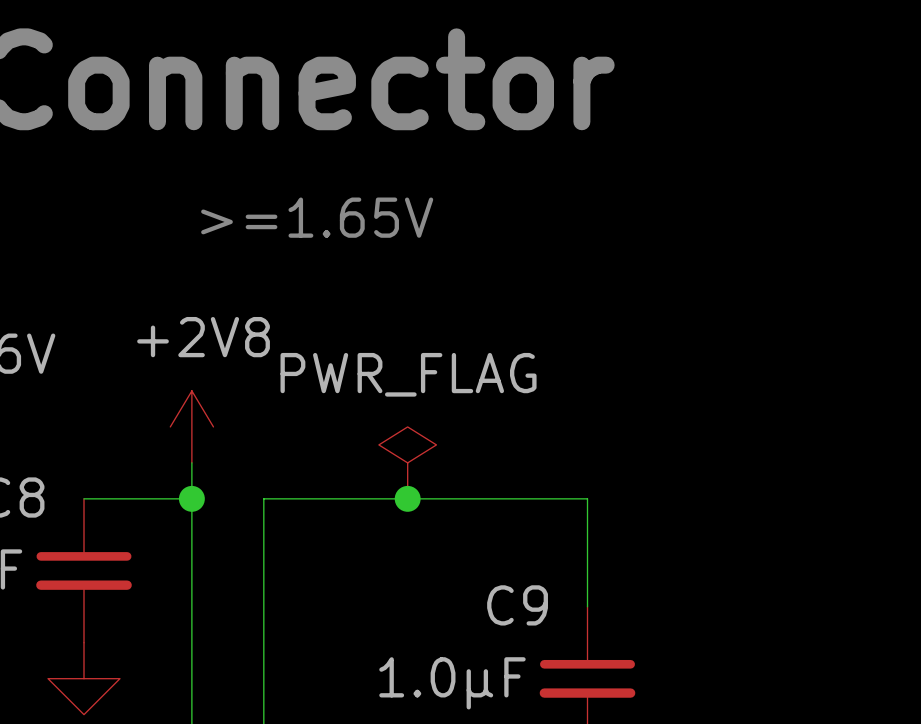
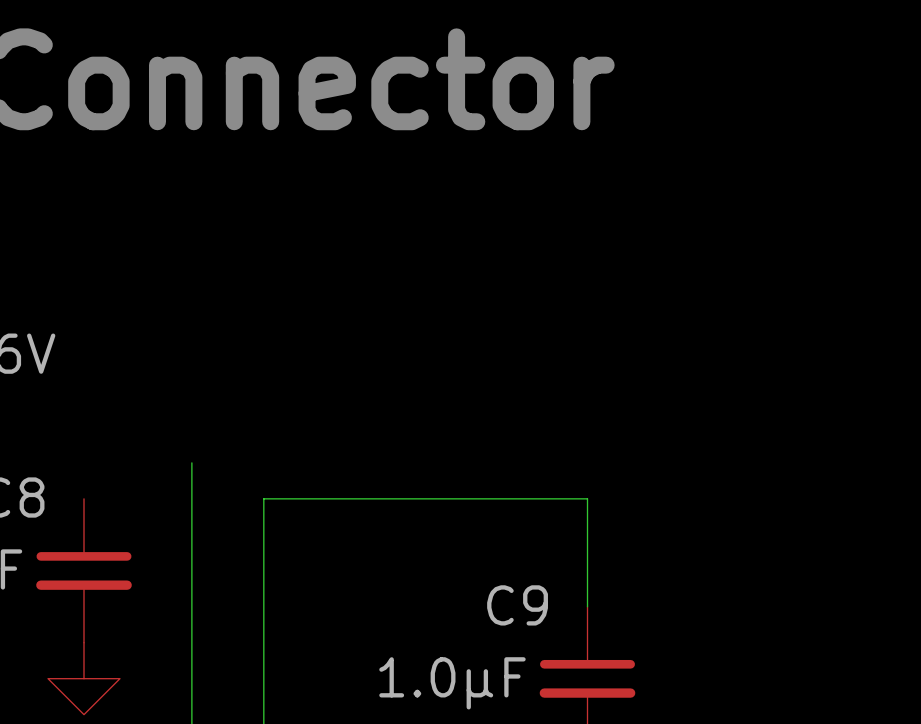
text: >=1.65V (317, 217) -> none
power symbol: +2V8 (191, 426) -> none
power symbol: PWR_FLAG (407, 462) -> none
wire: (83, 498) (191, 498) -> none
junction: (191, 498) -> none
junction: (407, 498) -> none

